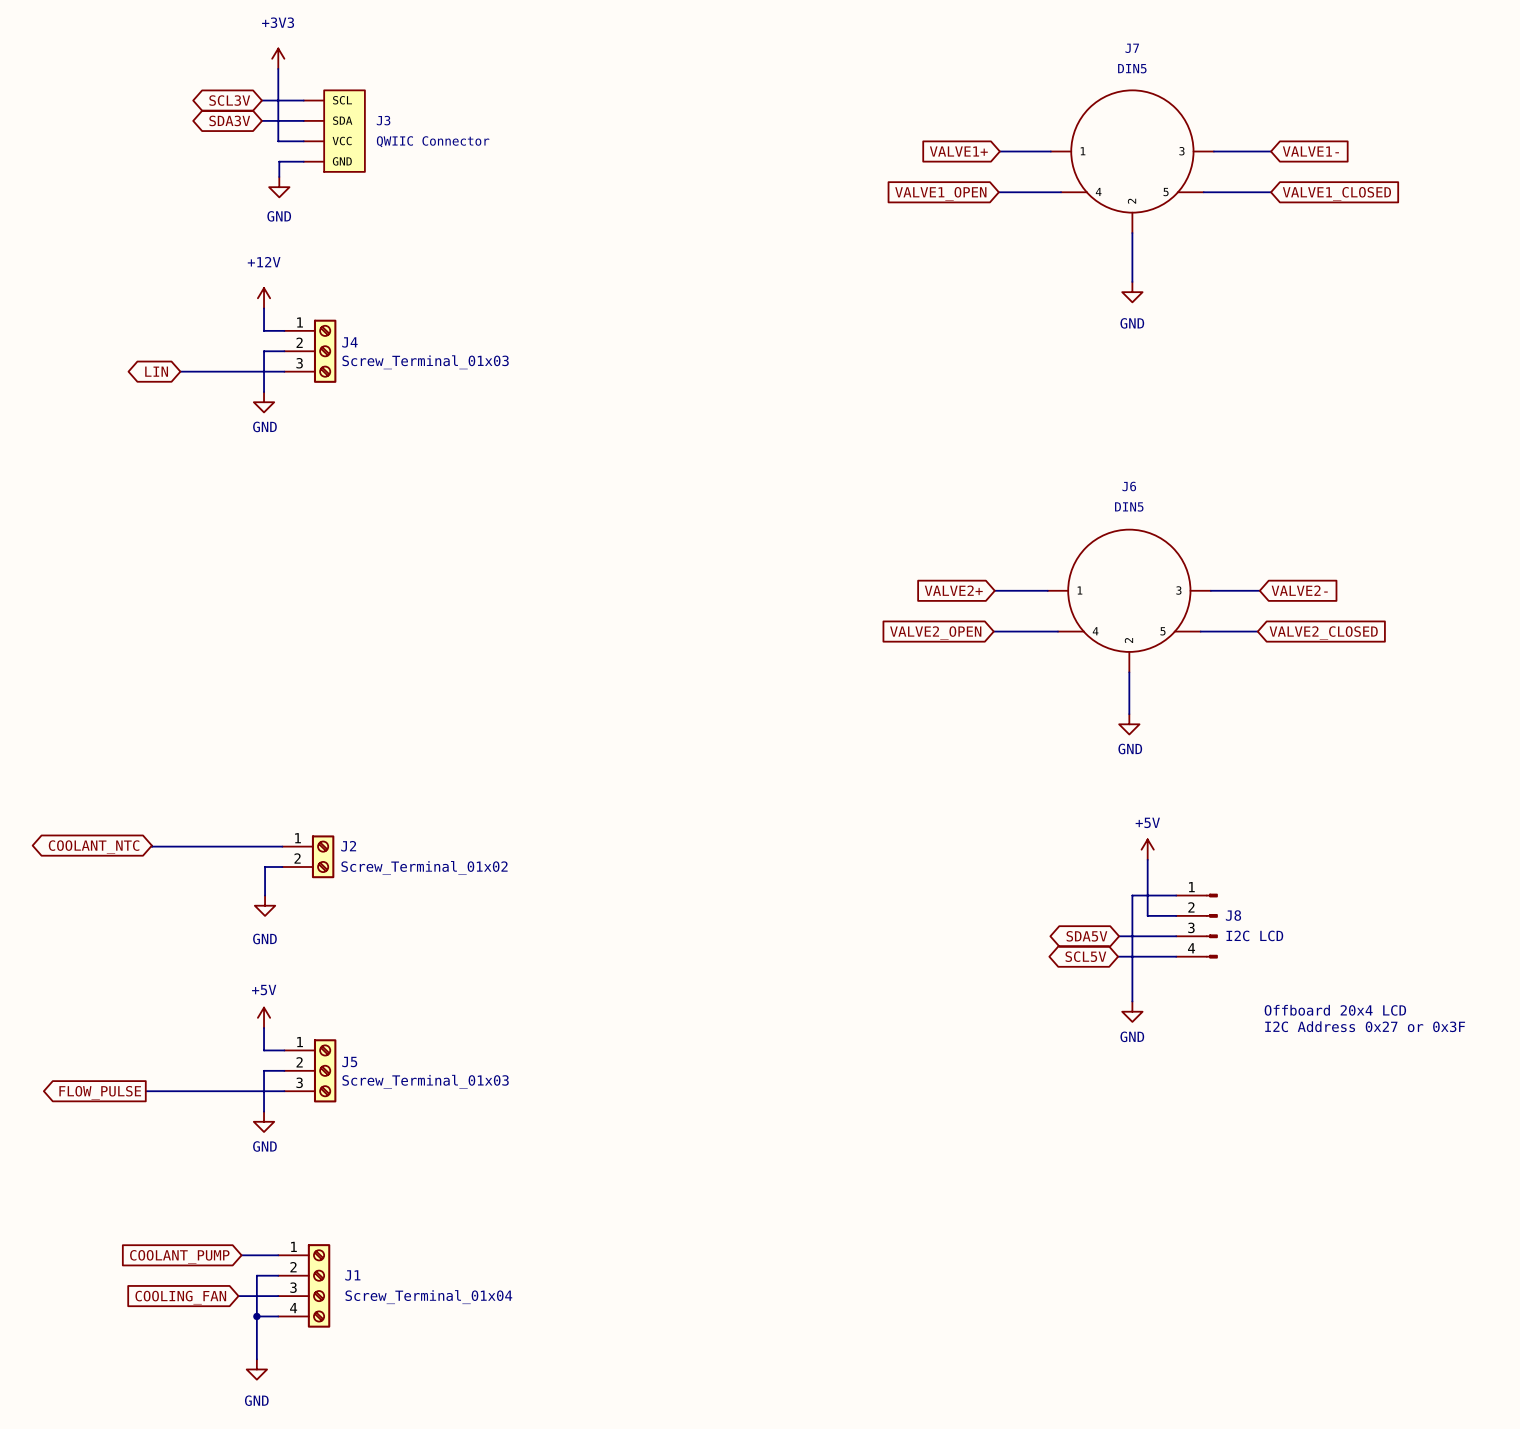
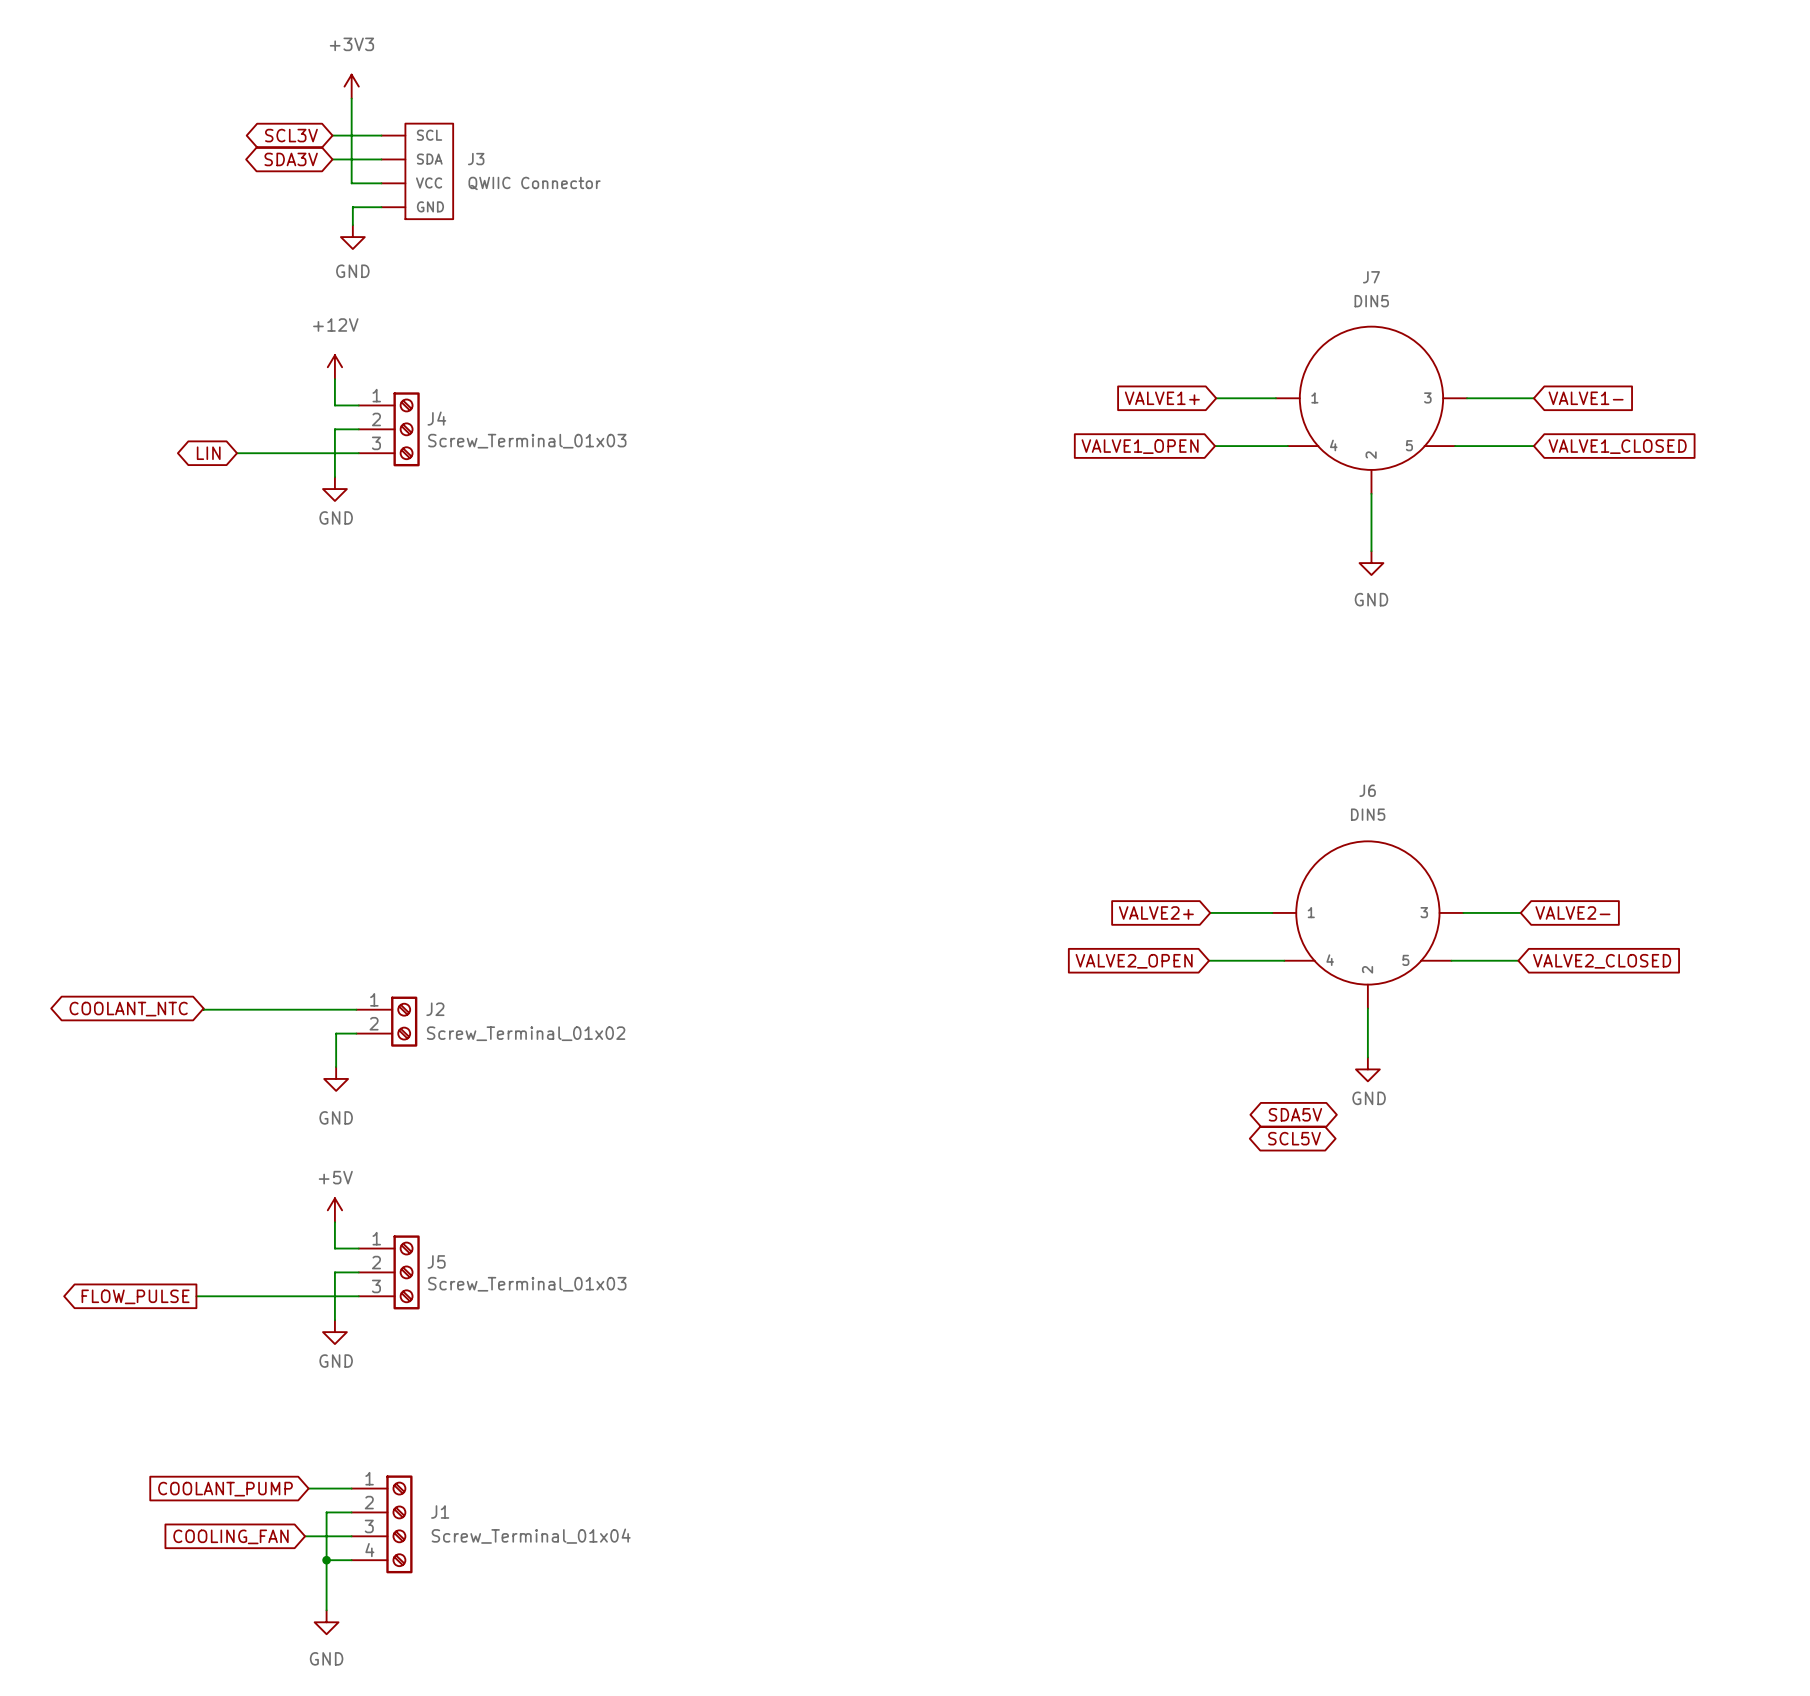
global label position: VALVE1+ (958, 151) -> VALVE1+ (1162, 398)
wire: (999, 151) (1050, 151) -> (1216, 398) (1275, 398)
wire: (1213, 151) (1271, 151) -> (1467, 398) (1533, 398)
global label position: VALVE1- (1310, 151) -> VALVE1- (1586, 398)
J7 position: (1132, 161) -> (1371, 410)
wire: (998, 192) (1061, 192) -> (1215, 446) (1287, 446)
wire: (1203, 192) (1271, 192) -> (1455, 446) (1533, 446)
global label position: VALVE1_OPEN (940, 193) -> VALVE1_OPEN (1140, 446)
global label position: VALVE1_CLOSED (1336, 193) -> VALVE1_CLOSED (1617, 446)
wire: (1132, 233) (1132, 281) -> (1371, 493) (1371, 551)
power symbol: GND (1132, 292) -> none
power symbol: none -> GND (1371, 563)
global label position: VALVE2+ (953, 590) -> VALVE2+ (1156, 912)
wire: (994, 590) (1047, 590) -> (1210, 912) (1272, 912)
wire: (1210, 590) (1259, 590) -> (1463, 912) (1520, 912)
global label position: VALVE2- (1299, 590) -> VALVE2- (1572, 912)
J6 position: (1129, 600) -> (1367, 924)
wire: (993, 631) (1057, 631) -> (1209, 960) (1284, 960)
wire: (1200, 631) (1257, 631) -> (1451, 960) (1518, 960)
global label position: VALVE2_OPEN (935, 633) -> VALVE2_OPEN (1134, 961)
global label position: VALVE2_CLOSED (1323, 633) -> VALVE2_CLOSED (1602, 961)
wire: (1129, 672) (1129, 714) -> (1367, 1008) (1367, 1057)
power symbol: GND (1129, 724) -> none
power symbol: +5V (1147, 849) -> none
wire: (1147, 859) (1147, 915) (1176, 915) -> none
wire: (1176, 895) (1132, 895) (1132, 1001) -> none
power symbol: none -> GND (1367, 1069)
J8: I2C LCD (1196, 926) -> none
wire: (1119, 936) (1176, 936) -> none
wire: (1118, 956) (1176, 956) -> none
text: Offboard 20x4 LCD (1335, 1010) -> none
power symbol: GND (1132, 1011) -> none
text: I2C Address 0x27 or 0x3F (1365, 1026) -> none

